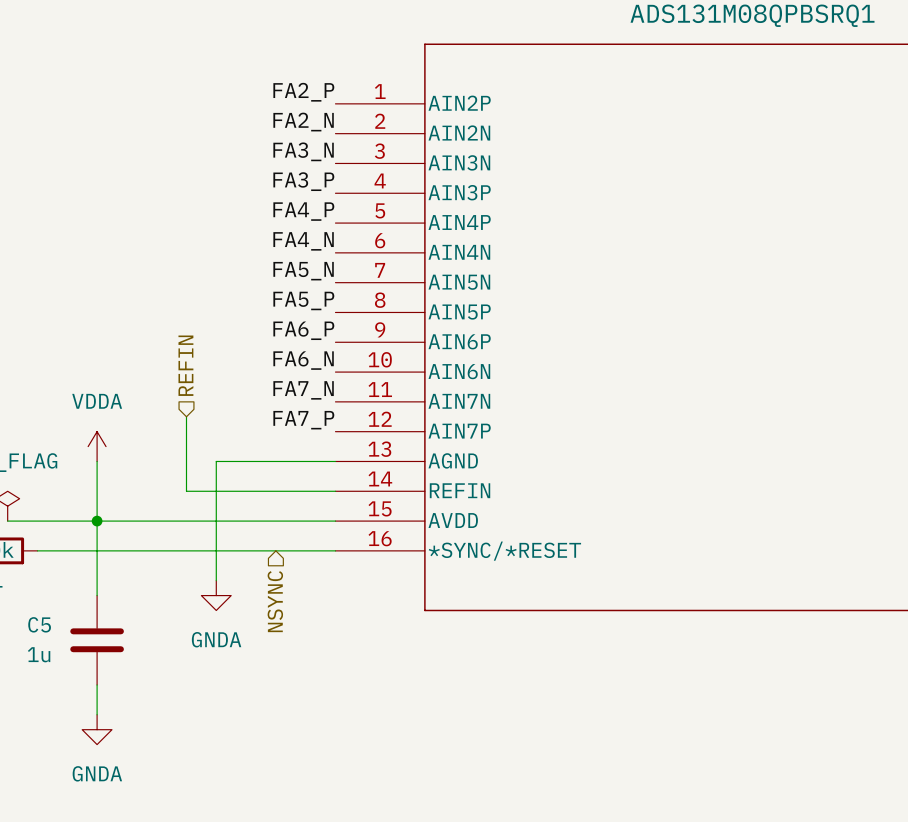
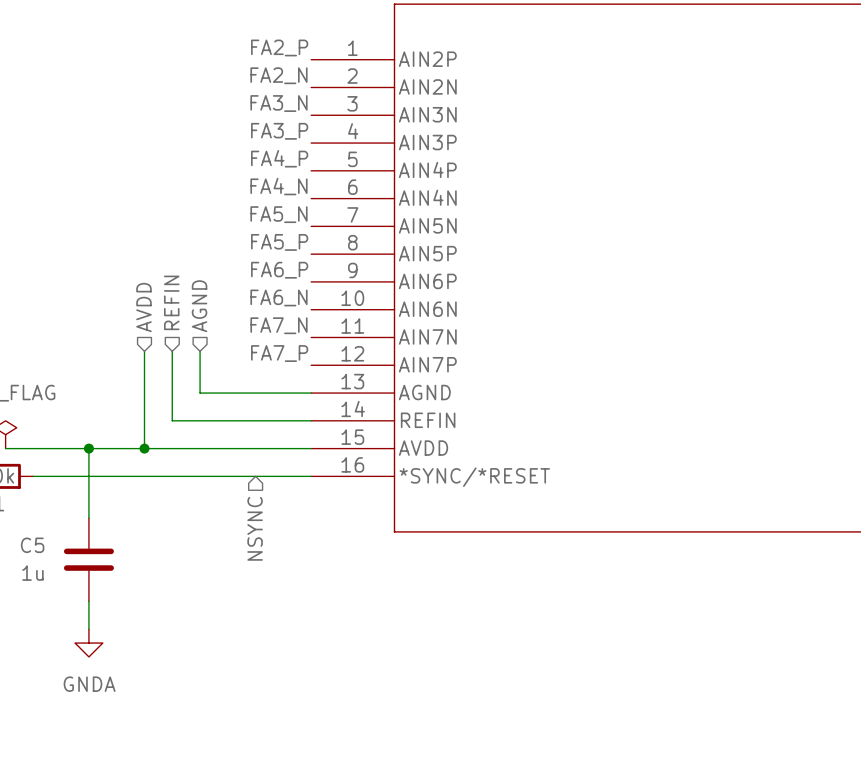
hierarchical label: none -> AVDD (143, 307)
hierarchical label: none -> AGND (199, 306)
wire: none -> (144, 351) (144, 448)
power symbol: VDDA (97, 446) -> none
wire: (97, 461) (97, 521) -> none
wire: (216, 461) (216, 580) -> (200, 393) (200, 351)
junction: none -> (144, 448)
power symbol: GNDA (216, 595) -> none

